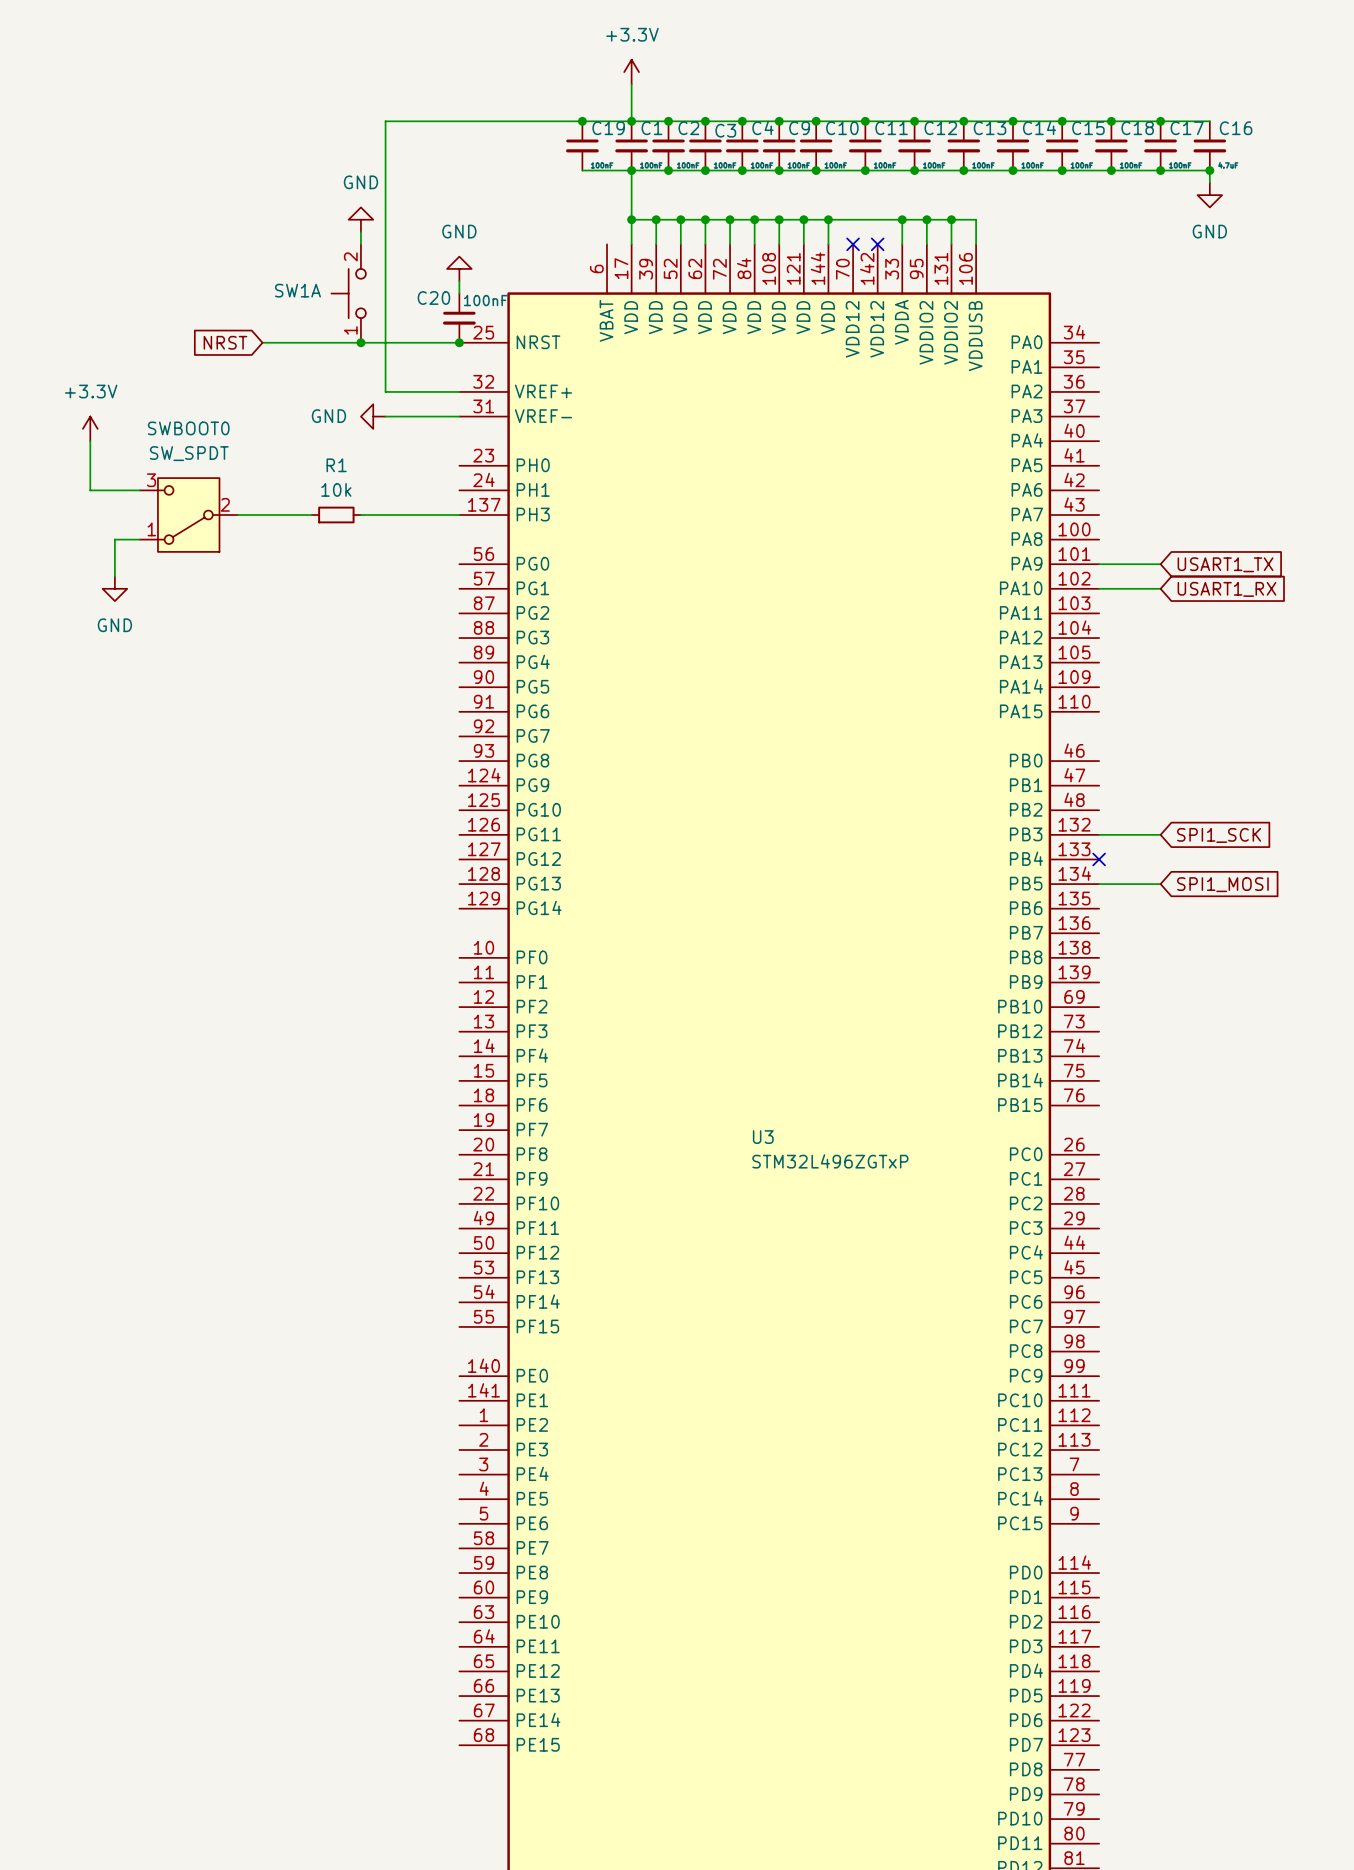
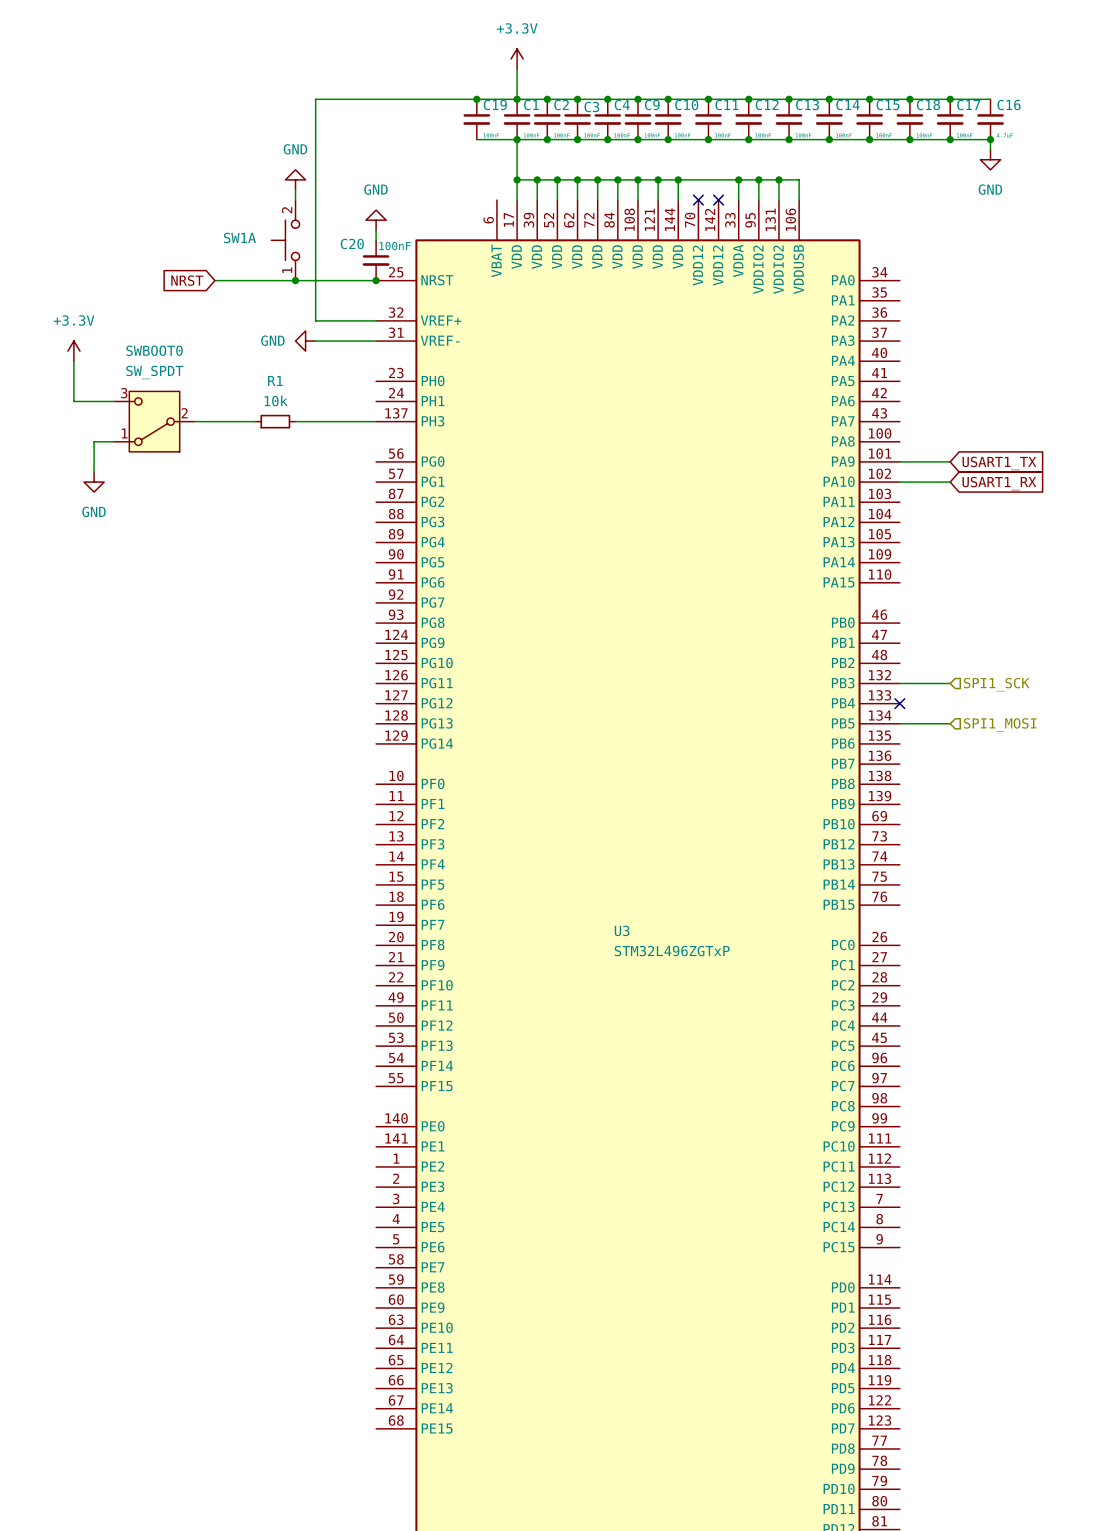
hierarchical label: none -> SPI1_SCK (996, 684)
global label: SPI1_SCK (1219, 835) -> none
global label: SPI1_MOSI (1222, 884) -> none
hierarchical label: none -> SPI1_MOSI (1000, 724)

